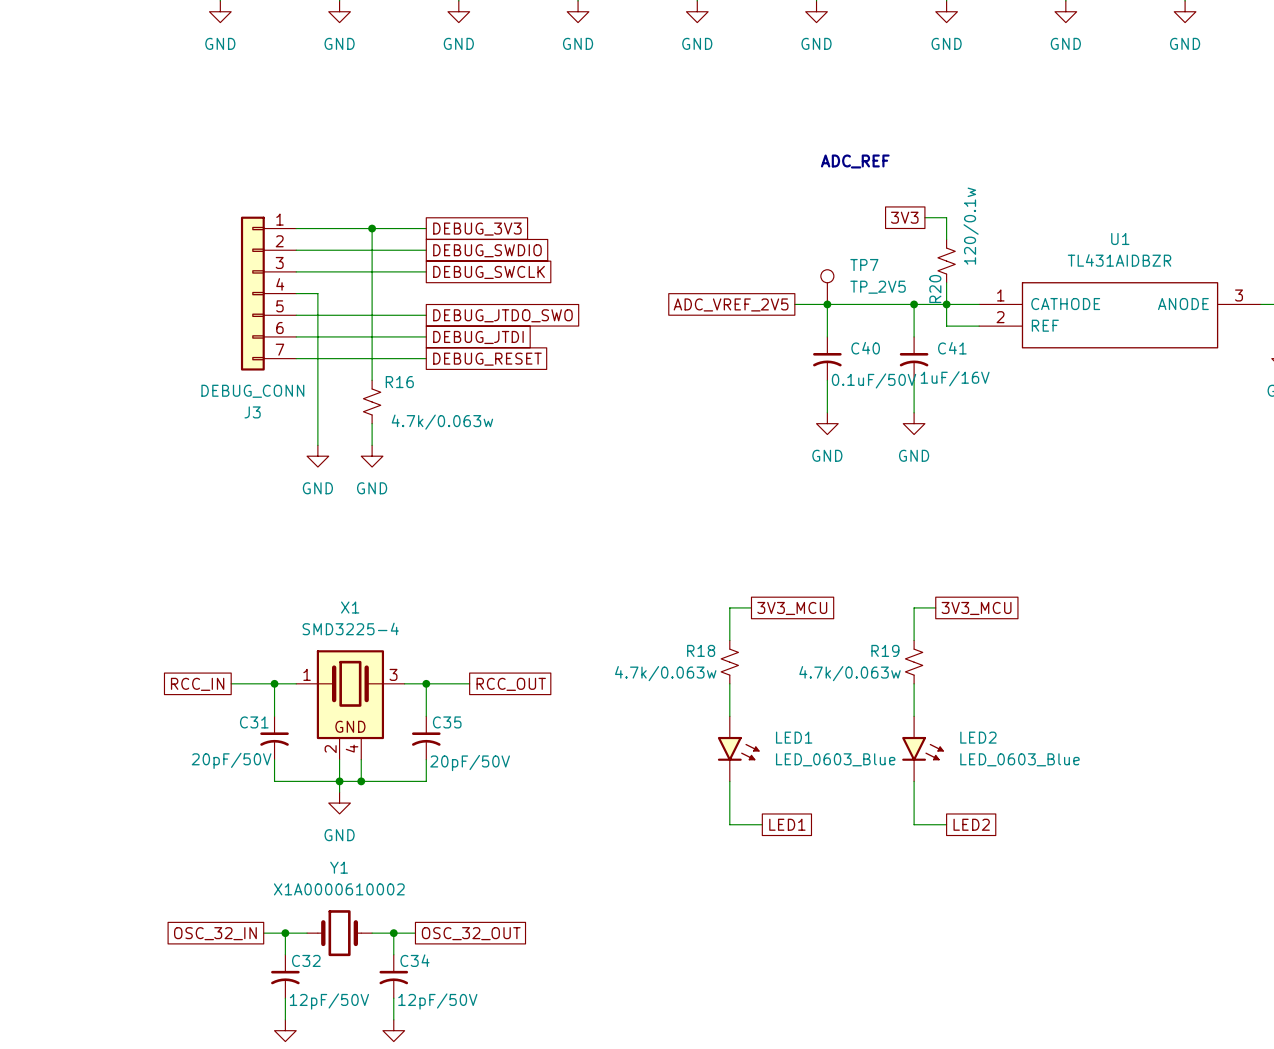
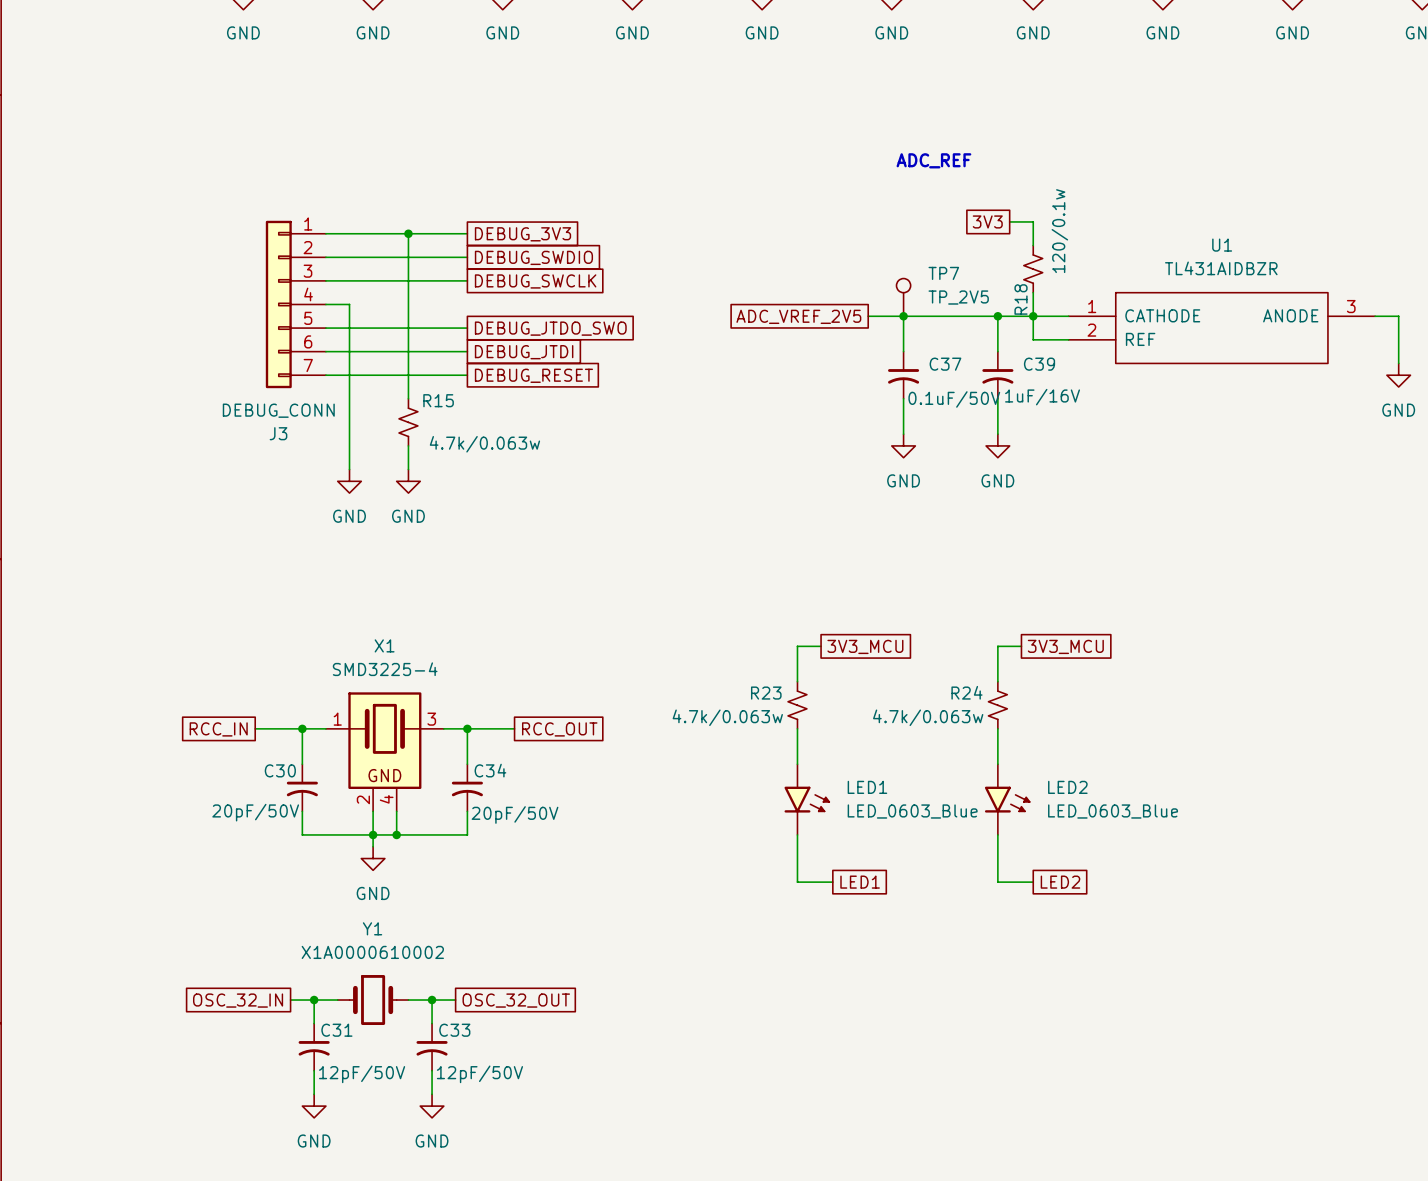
R20 name: R20 (935, 289) -> R18 (1021, 299)
C40 name: C40 (865, 348) -> C37 (945, 364)
C41 name: C41 (952, 348) -> C39 (1039, 364)
R16 name: R16 (399, 382) -> R15 (438, 400)
R18 name: R18 (701, 650) -> R23 (766, 693)
R19 name: R19 (885, 650) -> R24 (966, 692)
C31 name: C31 (254, 722) -> C30 (280, 770)
C35 name: C35 (447, 722) -> C34 (490, 770)
C32 name: C32 (306, 960) -> C31 (336, 1030)
C34 name: C34 (414, 960) -> C33 (454, 1030)

